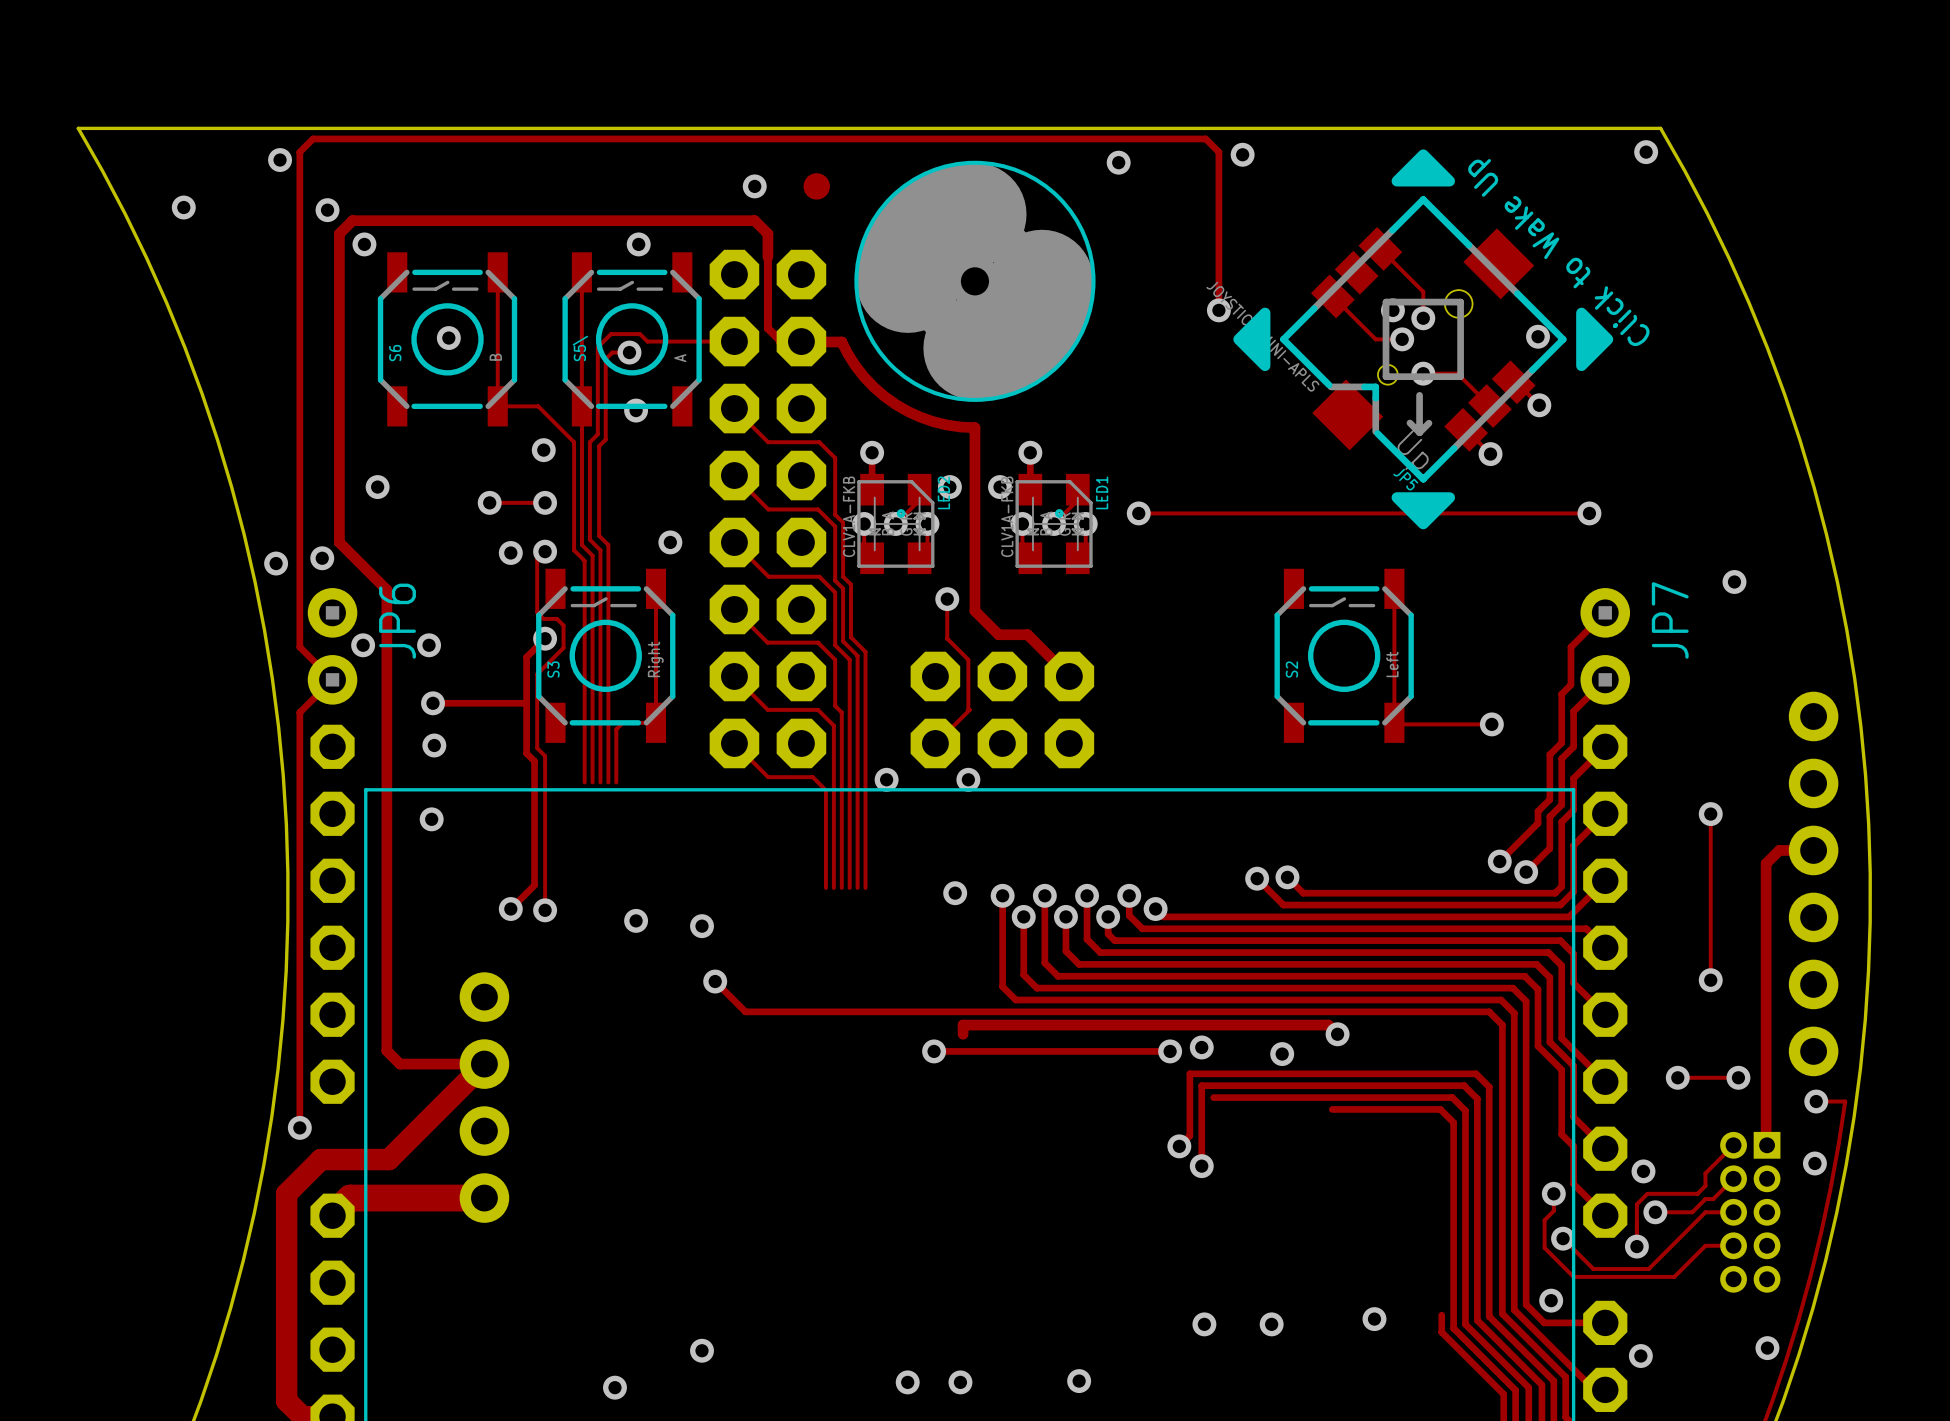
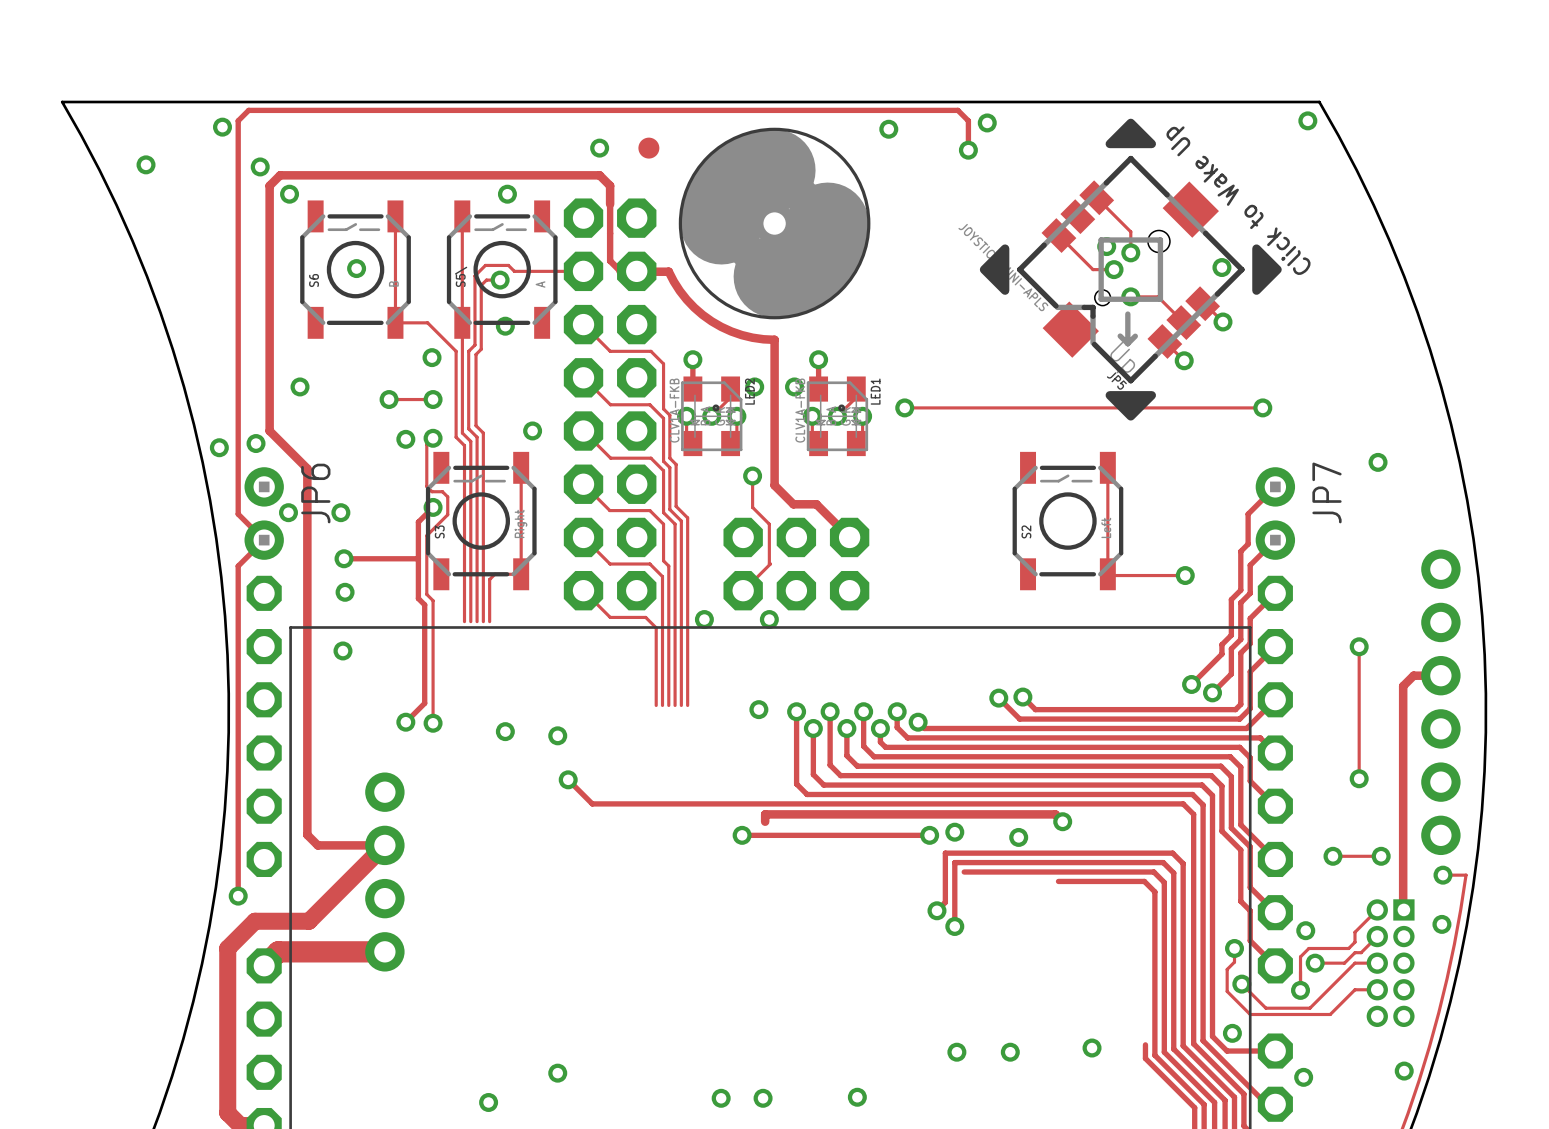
track: (1218, 189) (1218, 310) -> none
via position: (1218, 310) -> (968, 150)

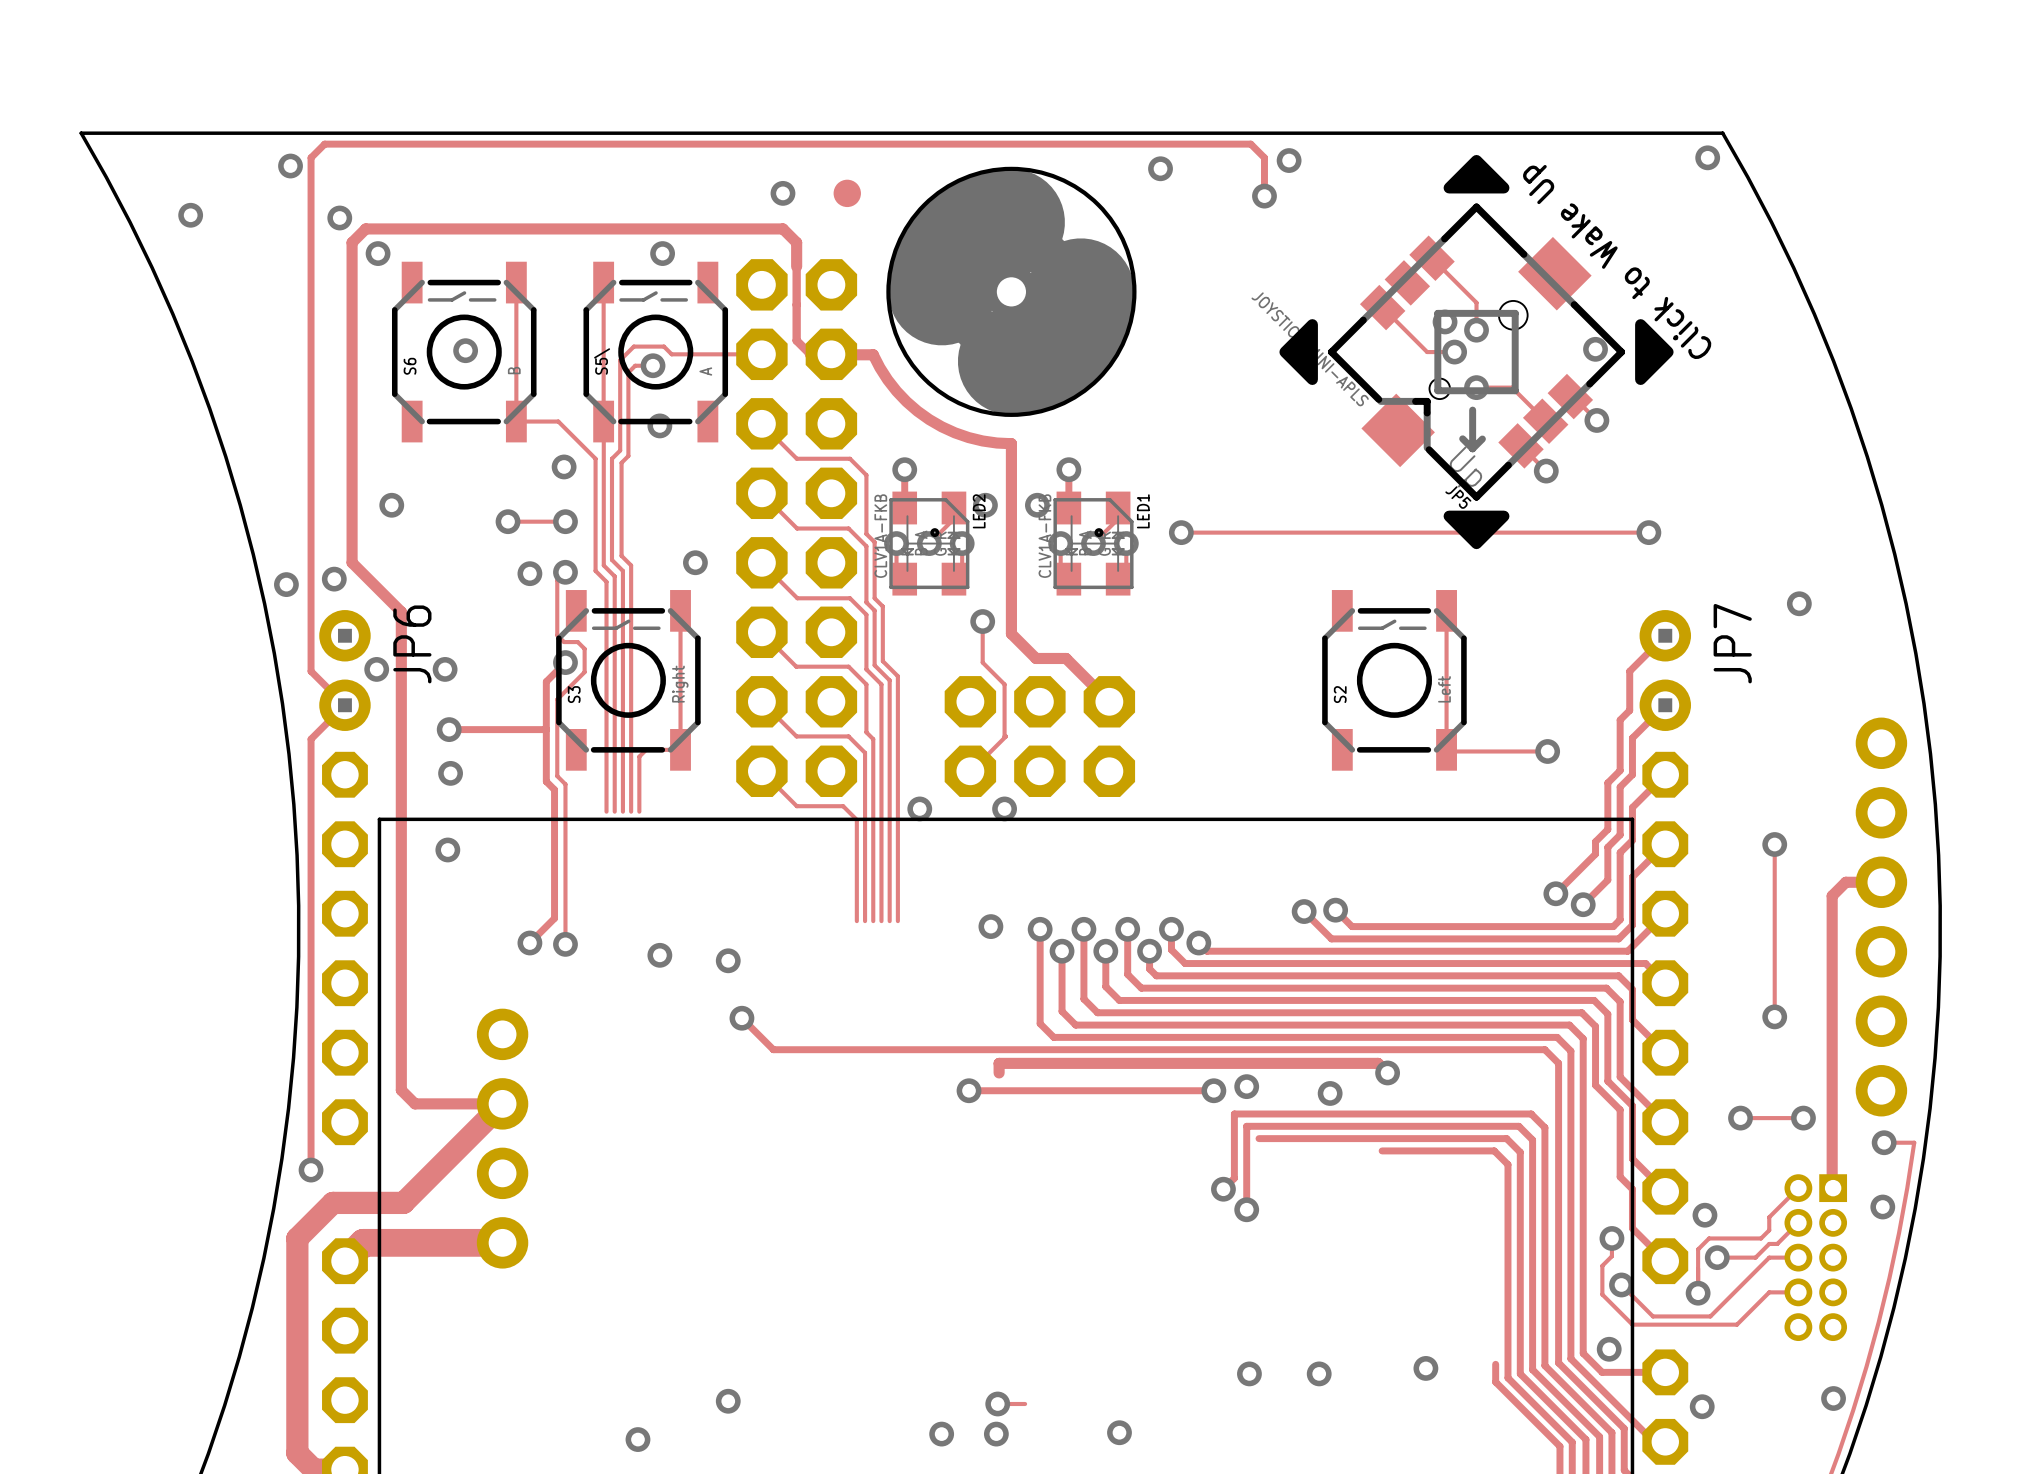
track: none -> (997, 1403) (1025, 1403)
via: none -> (997, 1403)

